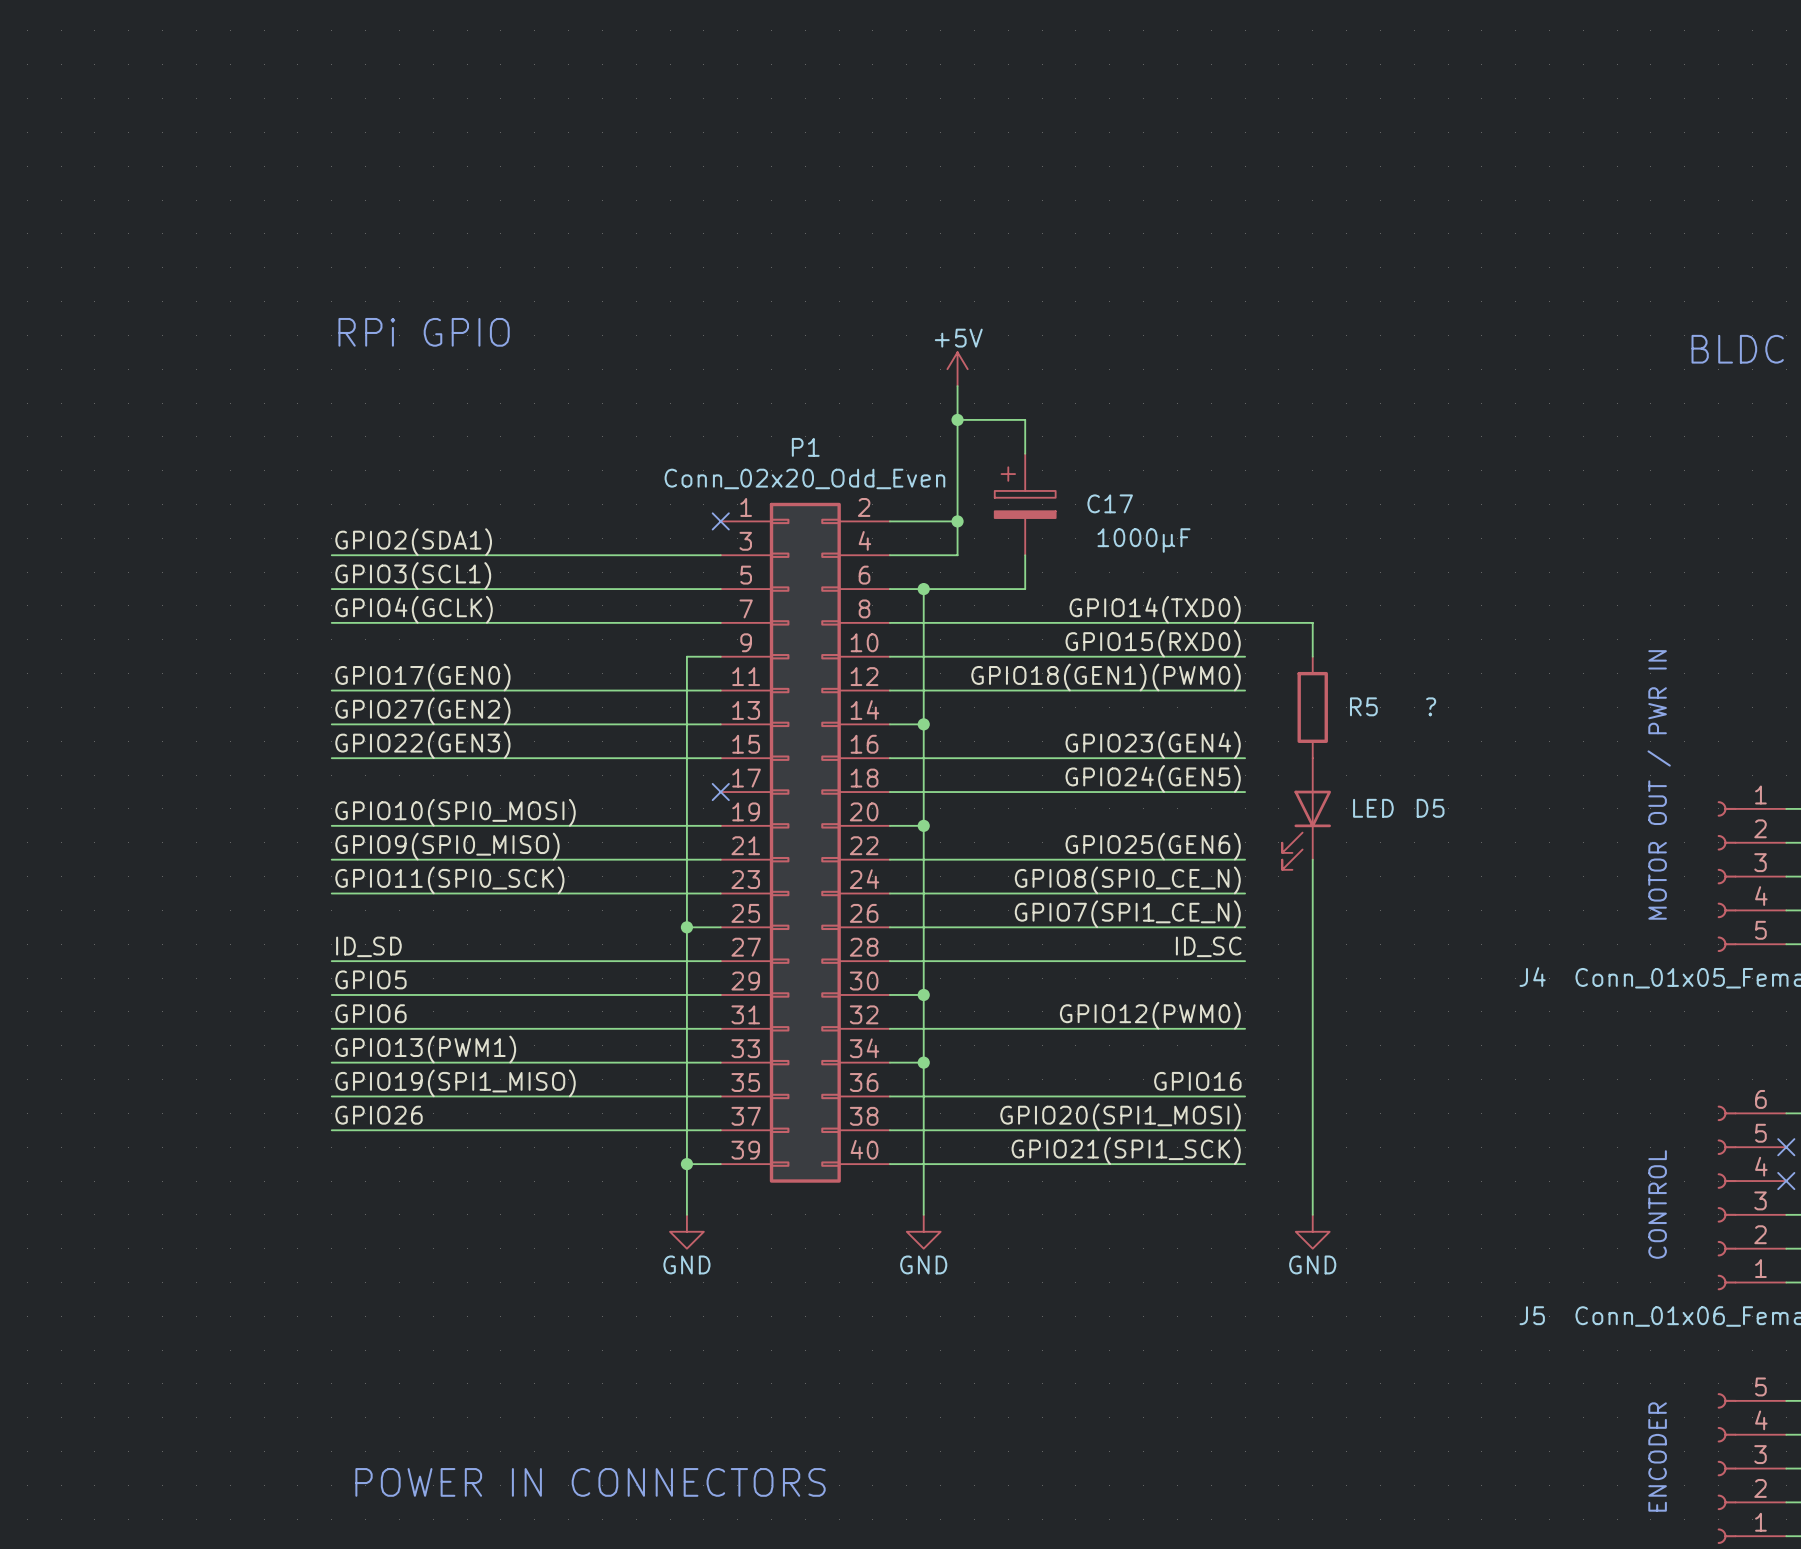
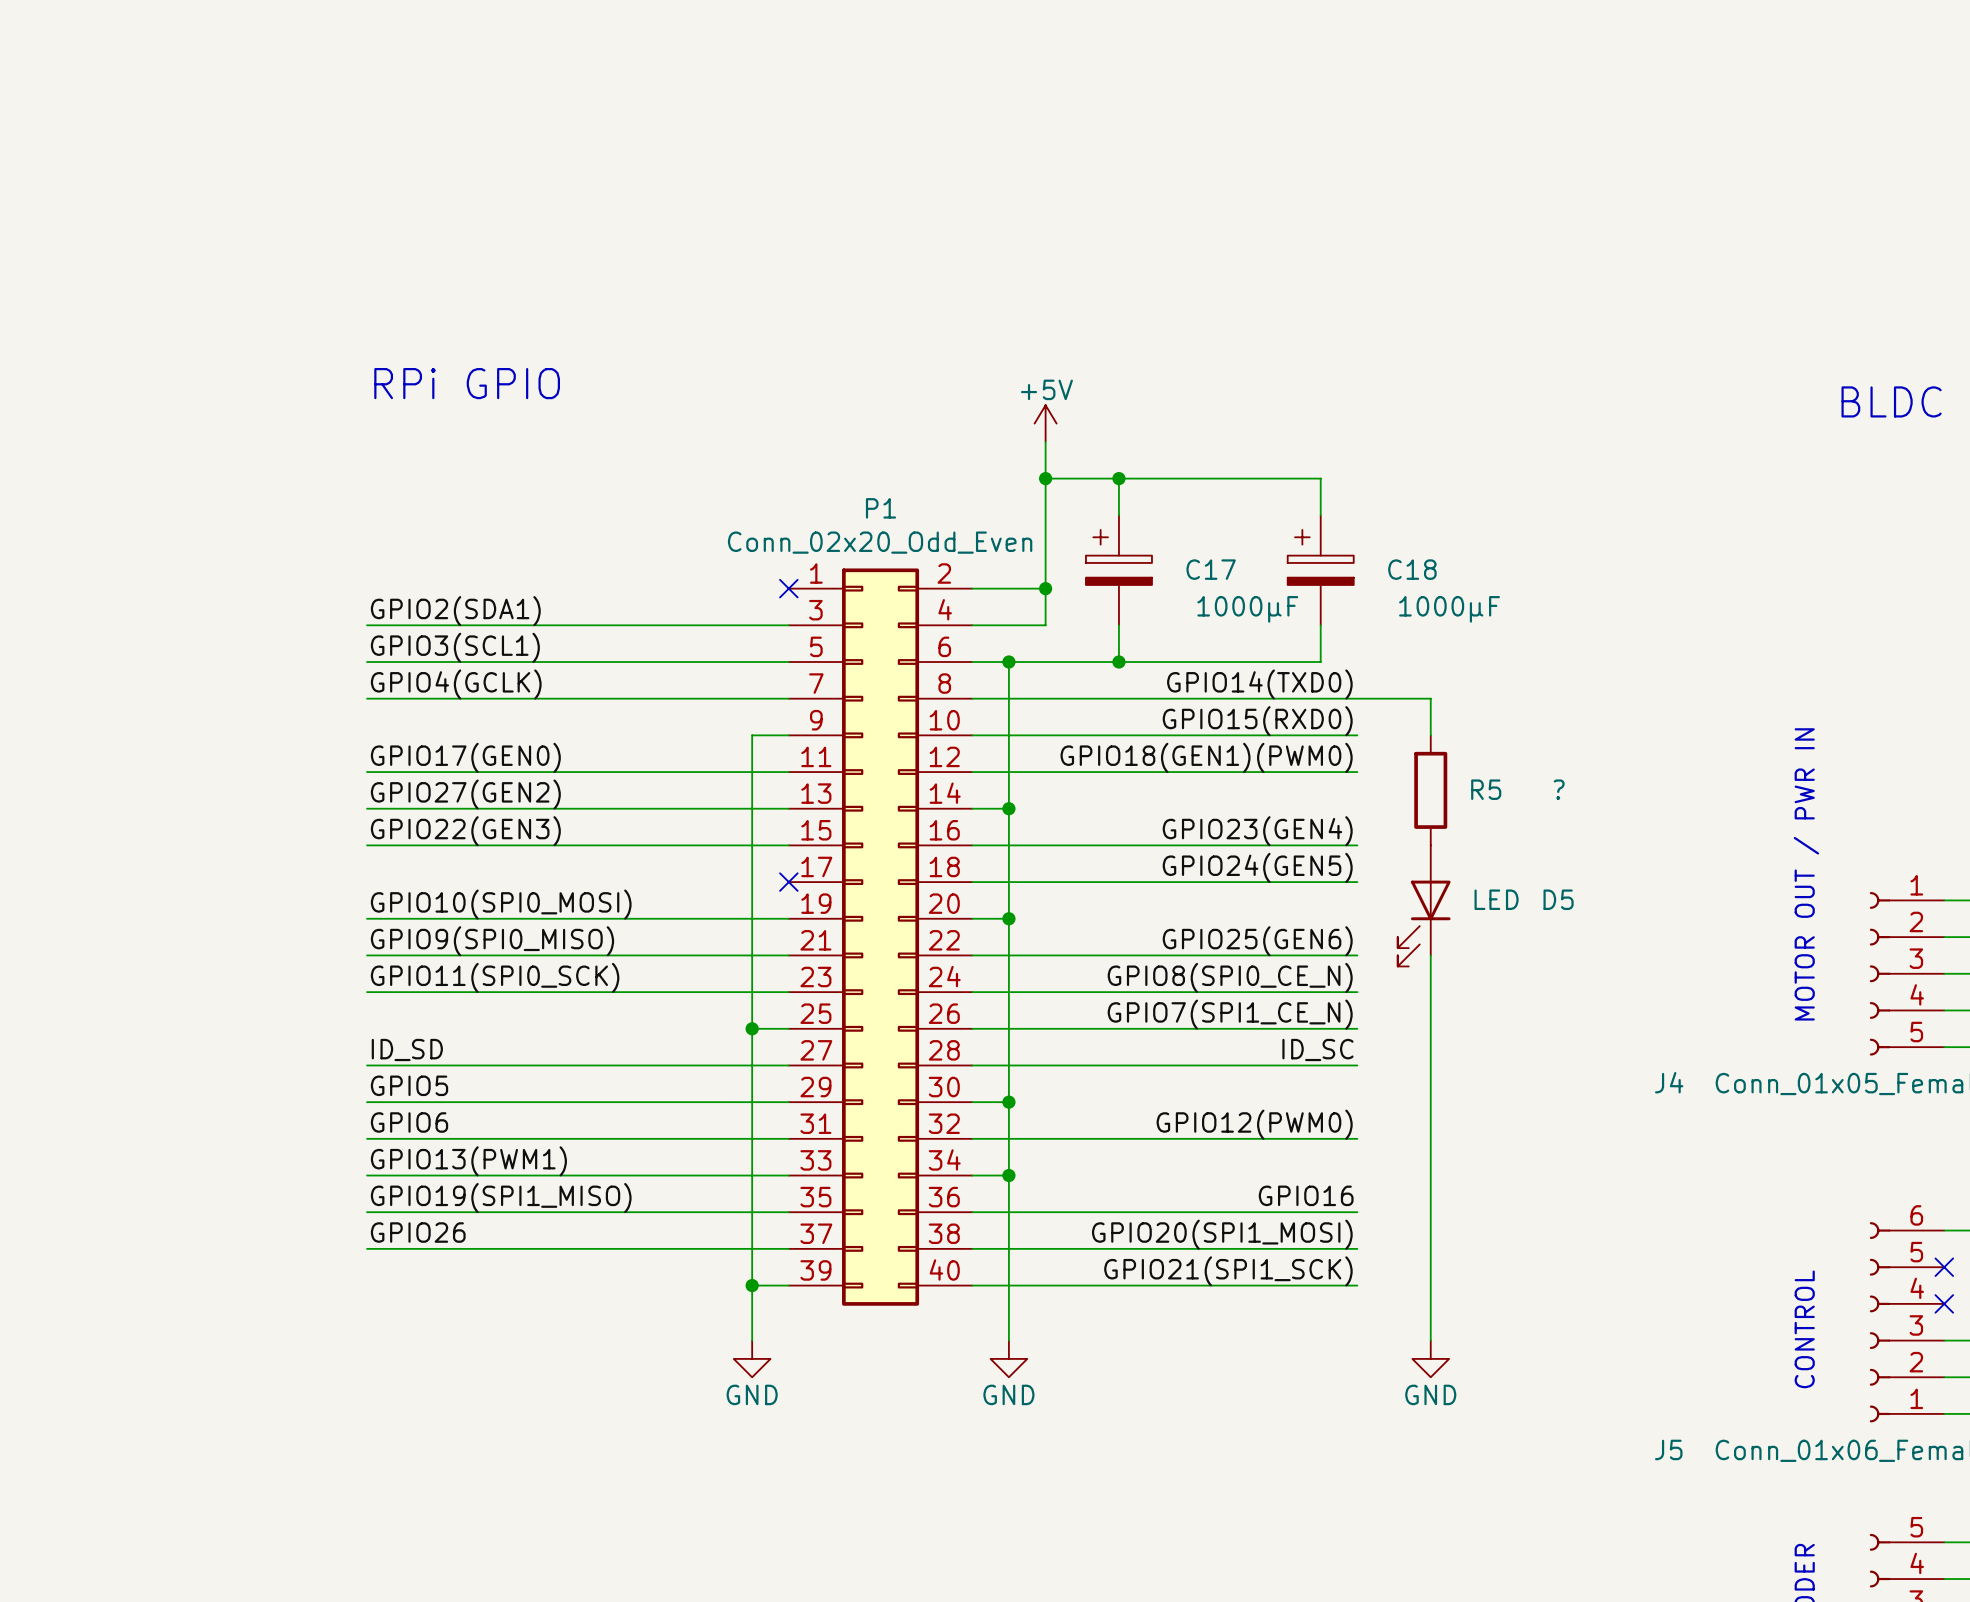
wire: none -> (1118, 478) (1320, 478) (1320, 515)
junction: none -> (1118, 478)
C18: none -> 1000µF (1320, 570)
wire: none -> (1320, 625) (1320, 662) (1118, 662)
junction: none -> (1118, 662)

